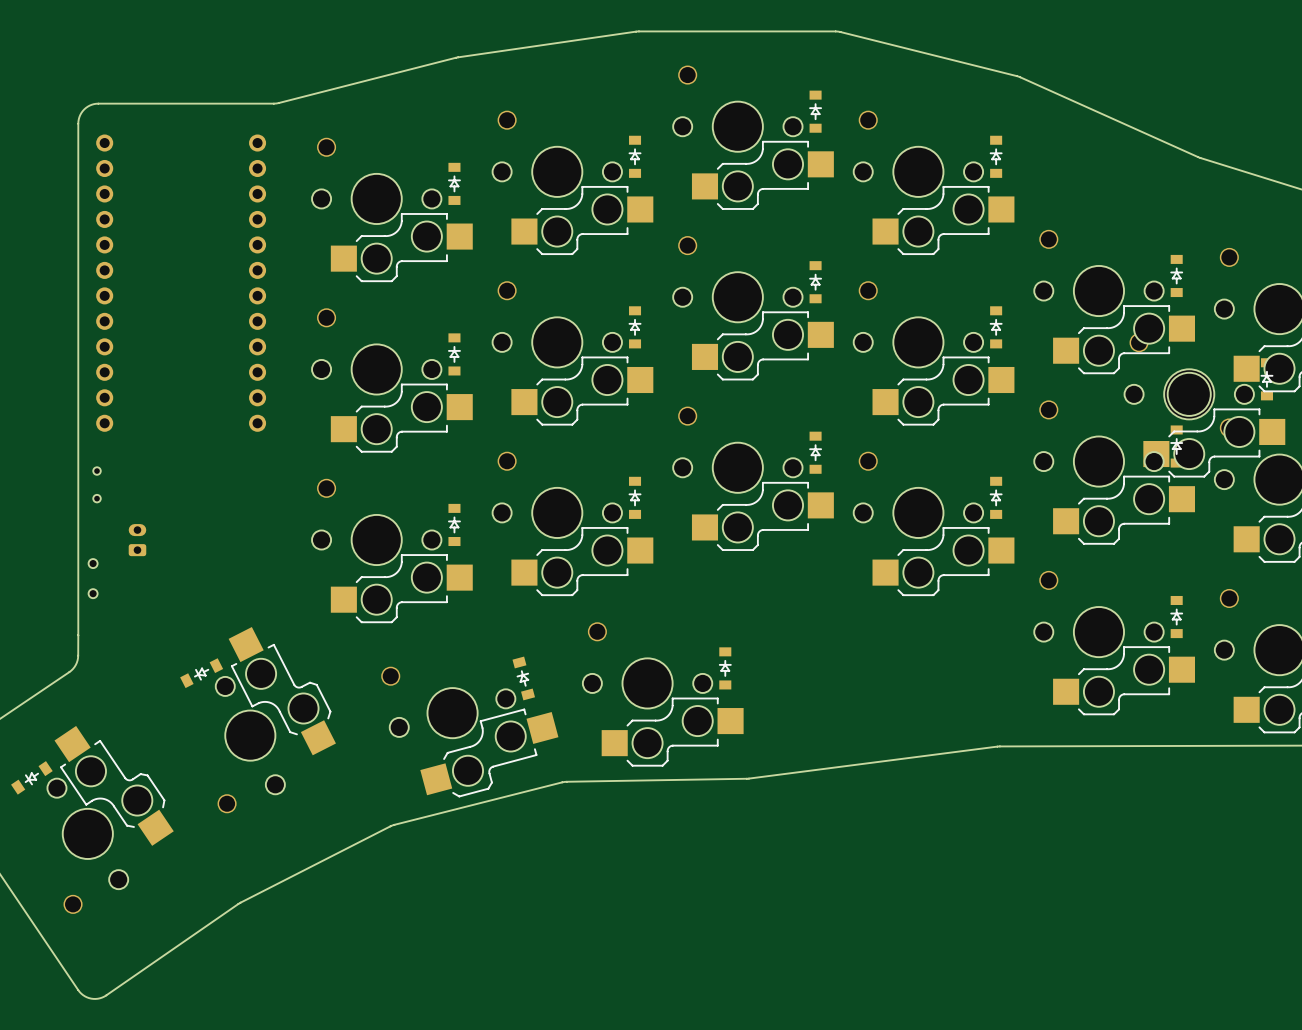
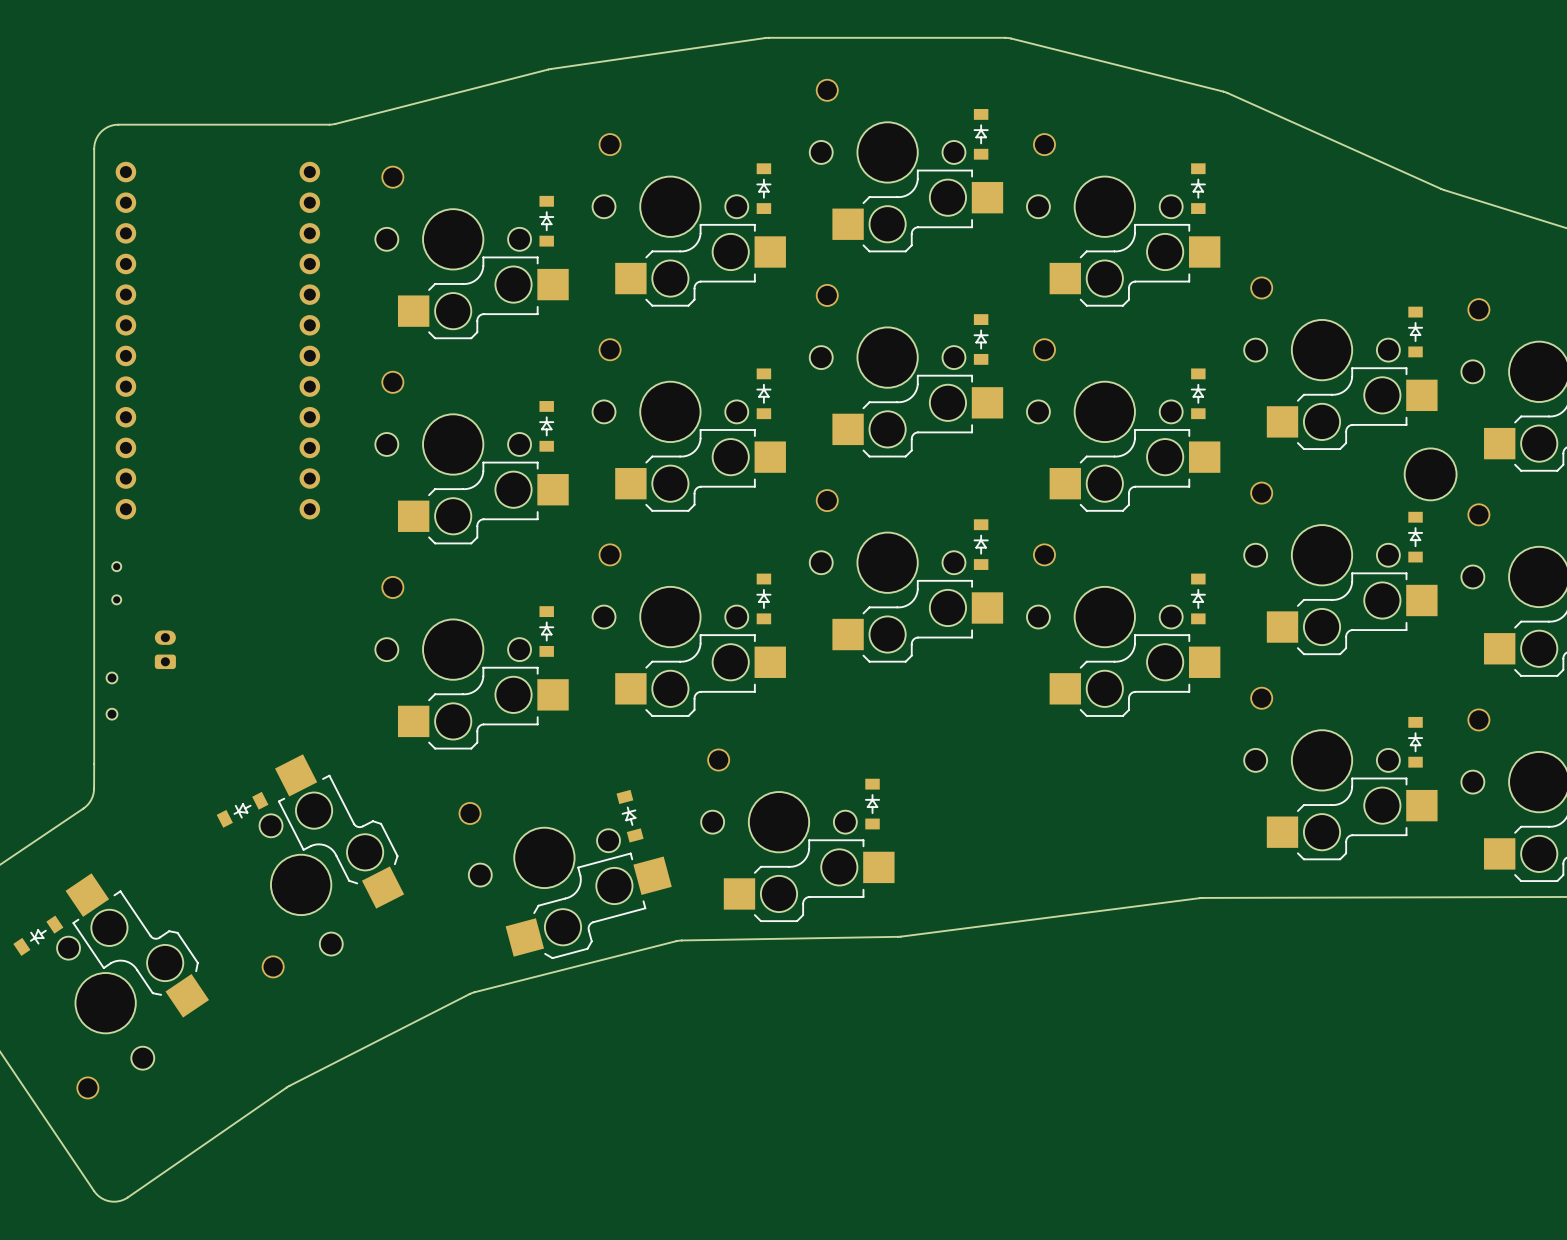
part: (1266, 379) -> none
part: (1204, 405) -> none

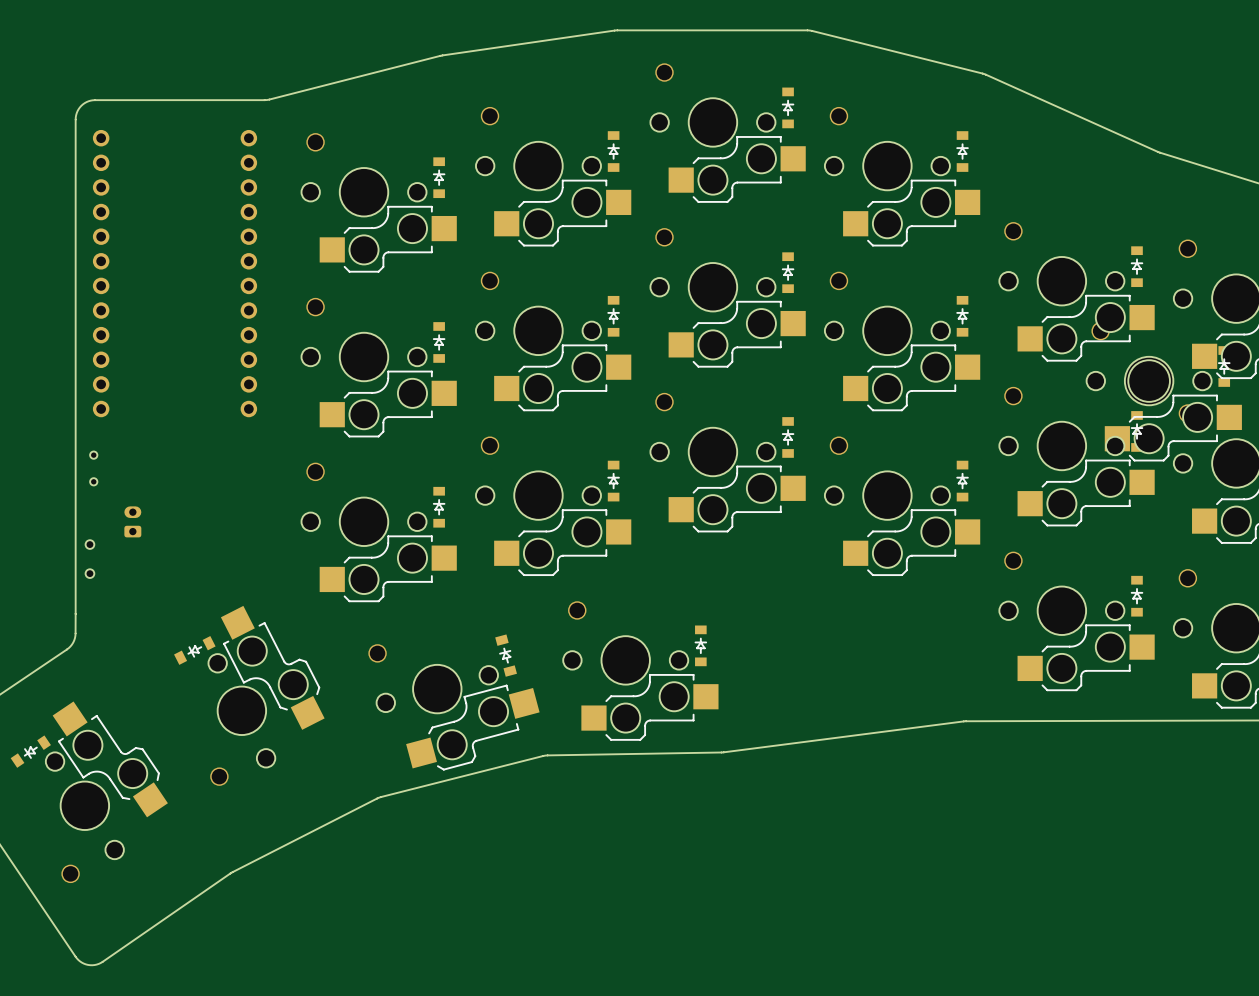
part: none -> (1224, 366)
part: none -> (1164, 391)

